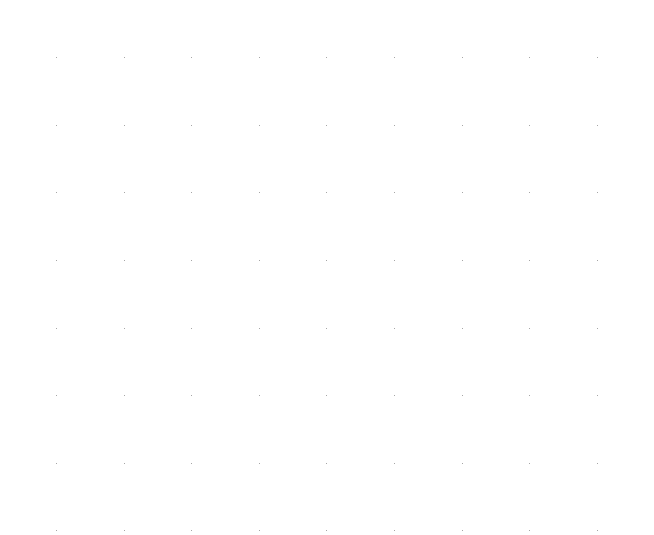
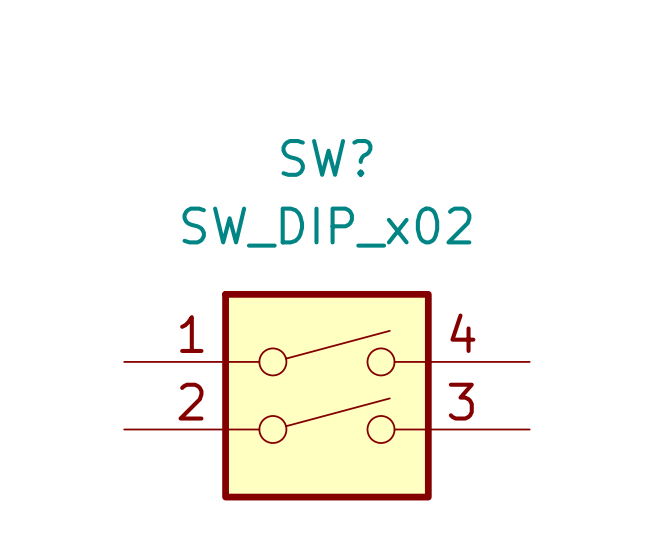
SW?: none -> SW_DIP_x02 (326, 395)

